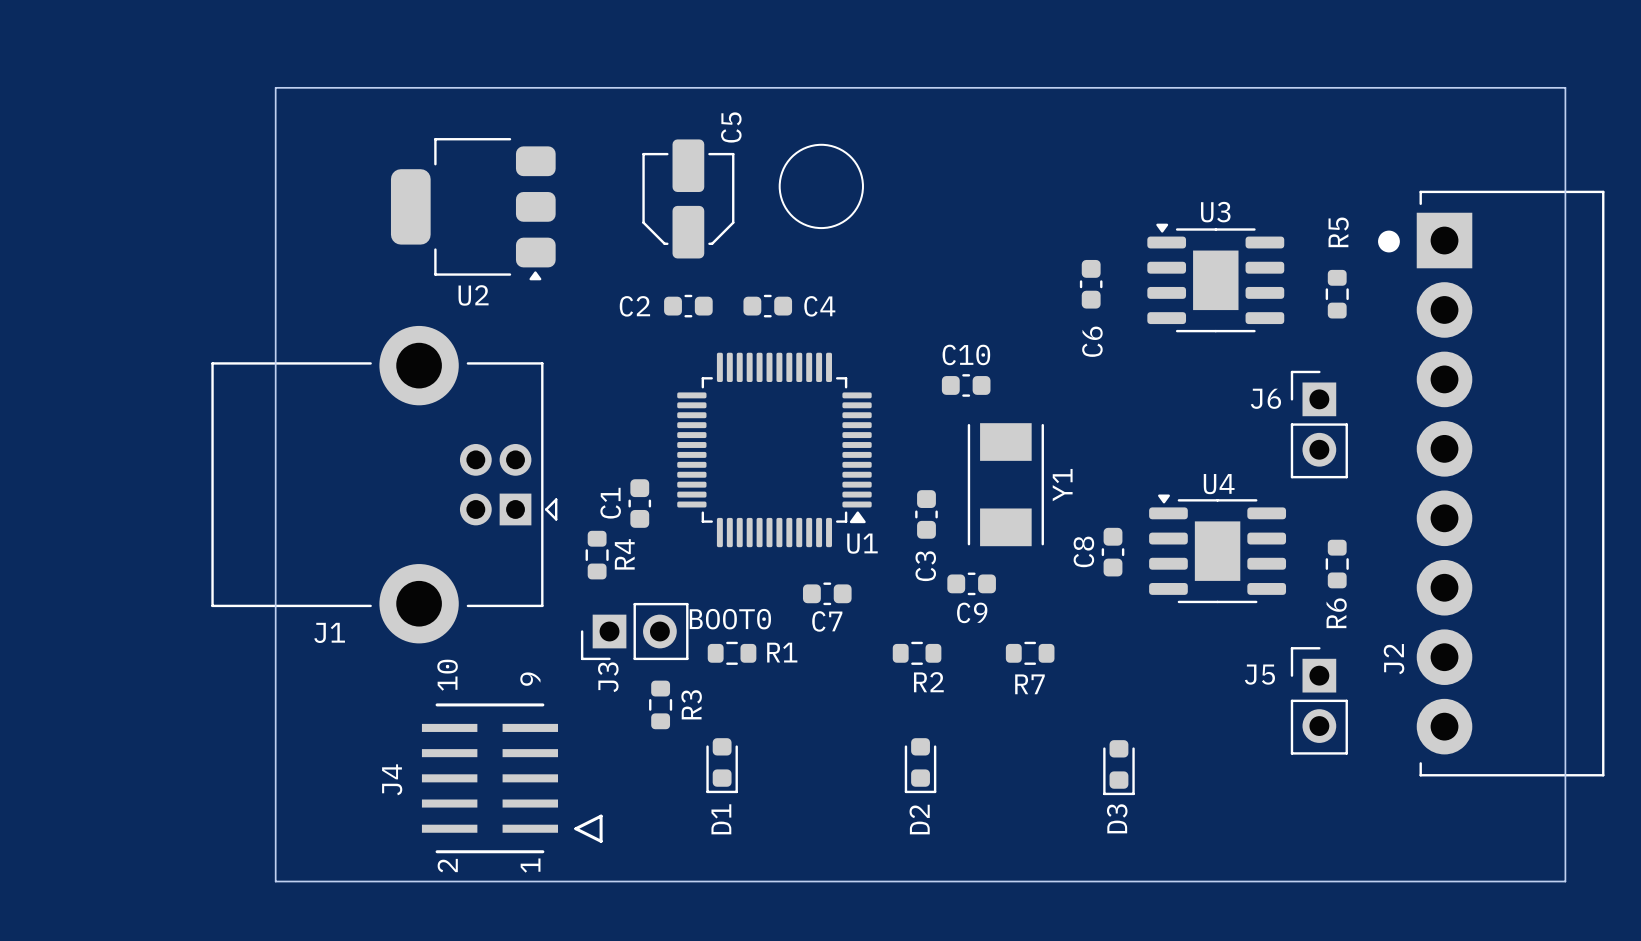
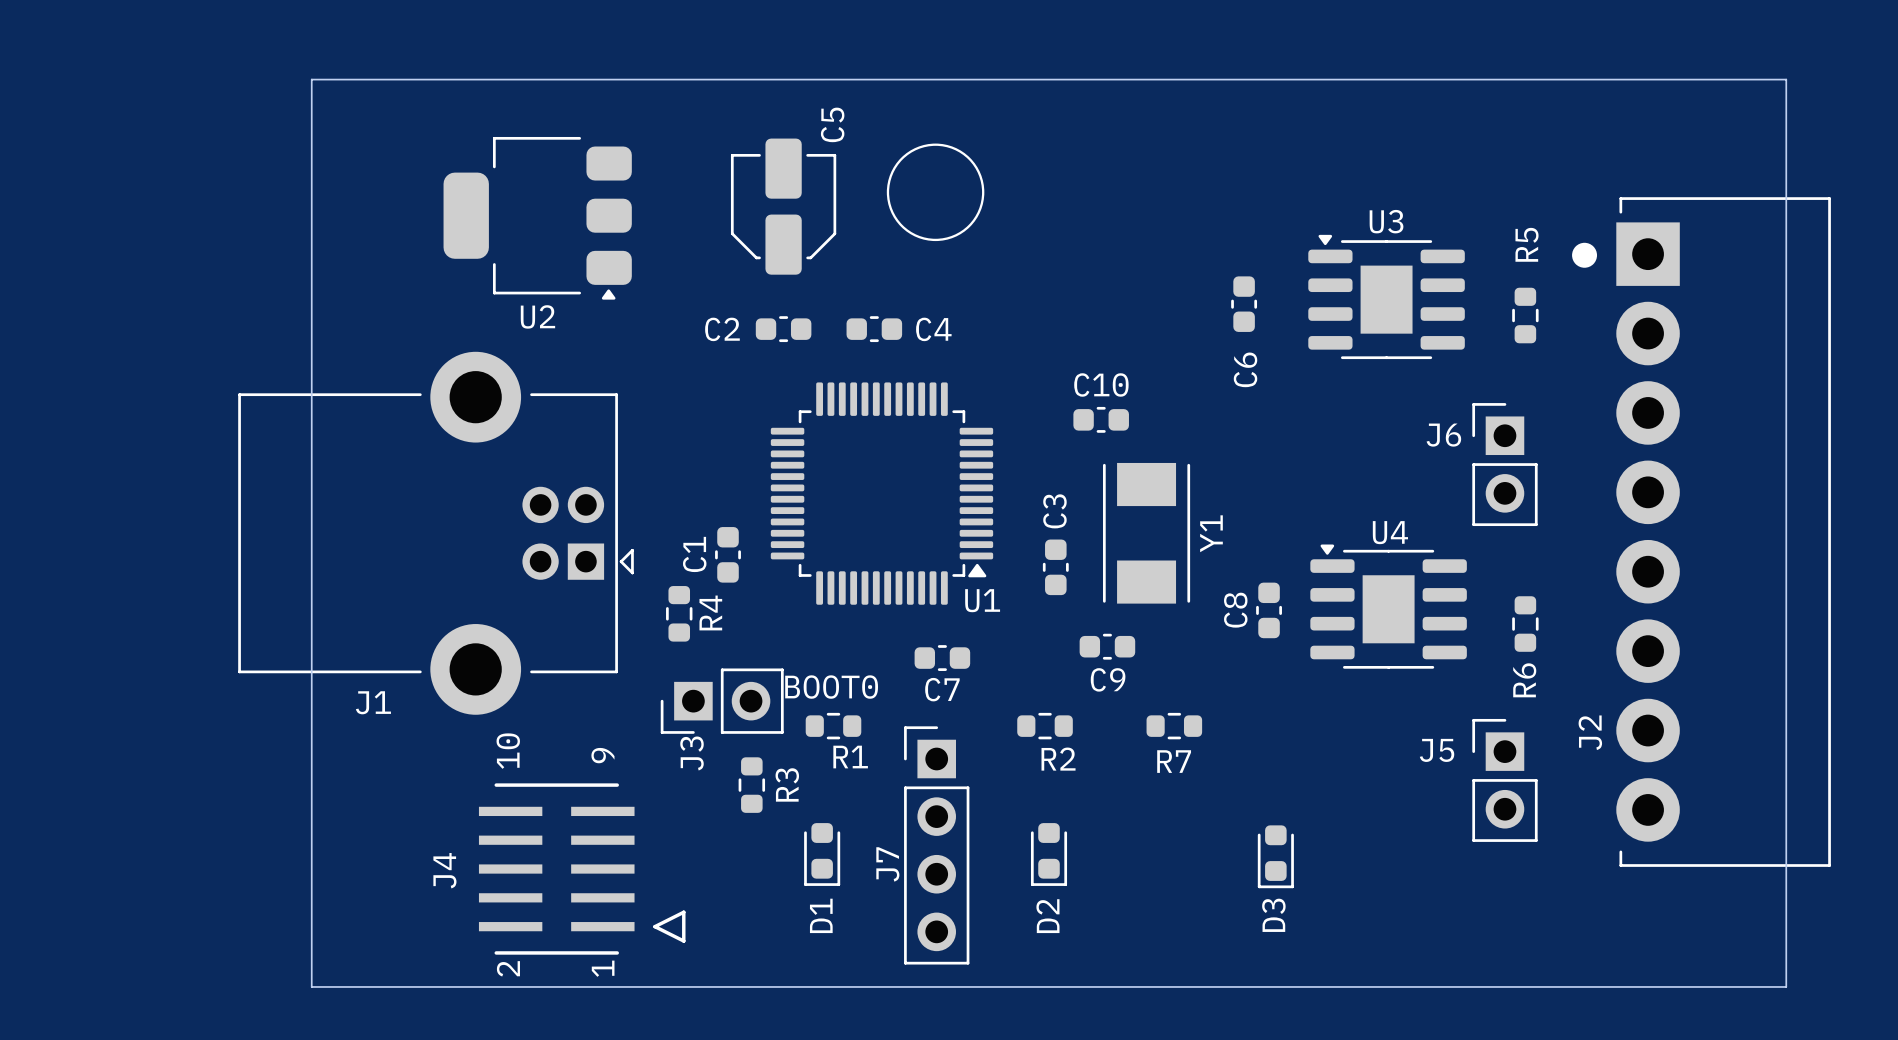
C3 name position: C3 (925, 566) -> C3 (1054, 511)
R1 name position: R1 (782, 652) -> R1 (850, 757)
J7: none -> (936, 845)

